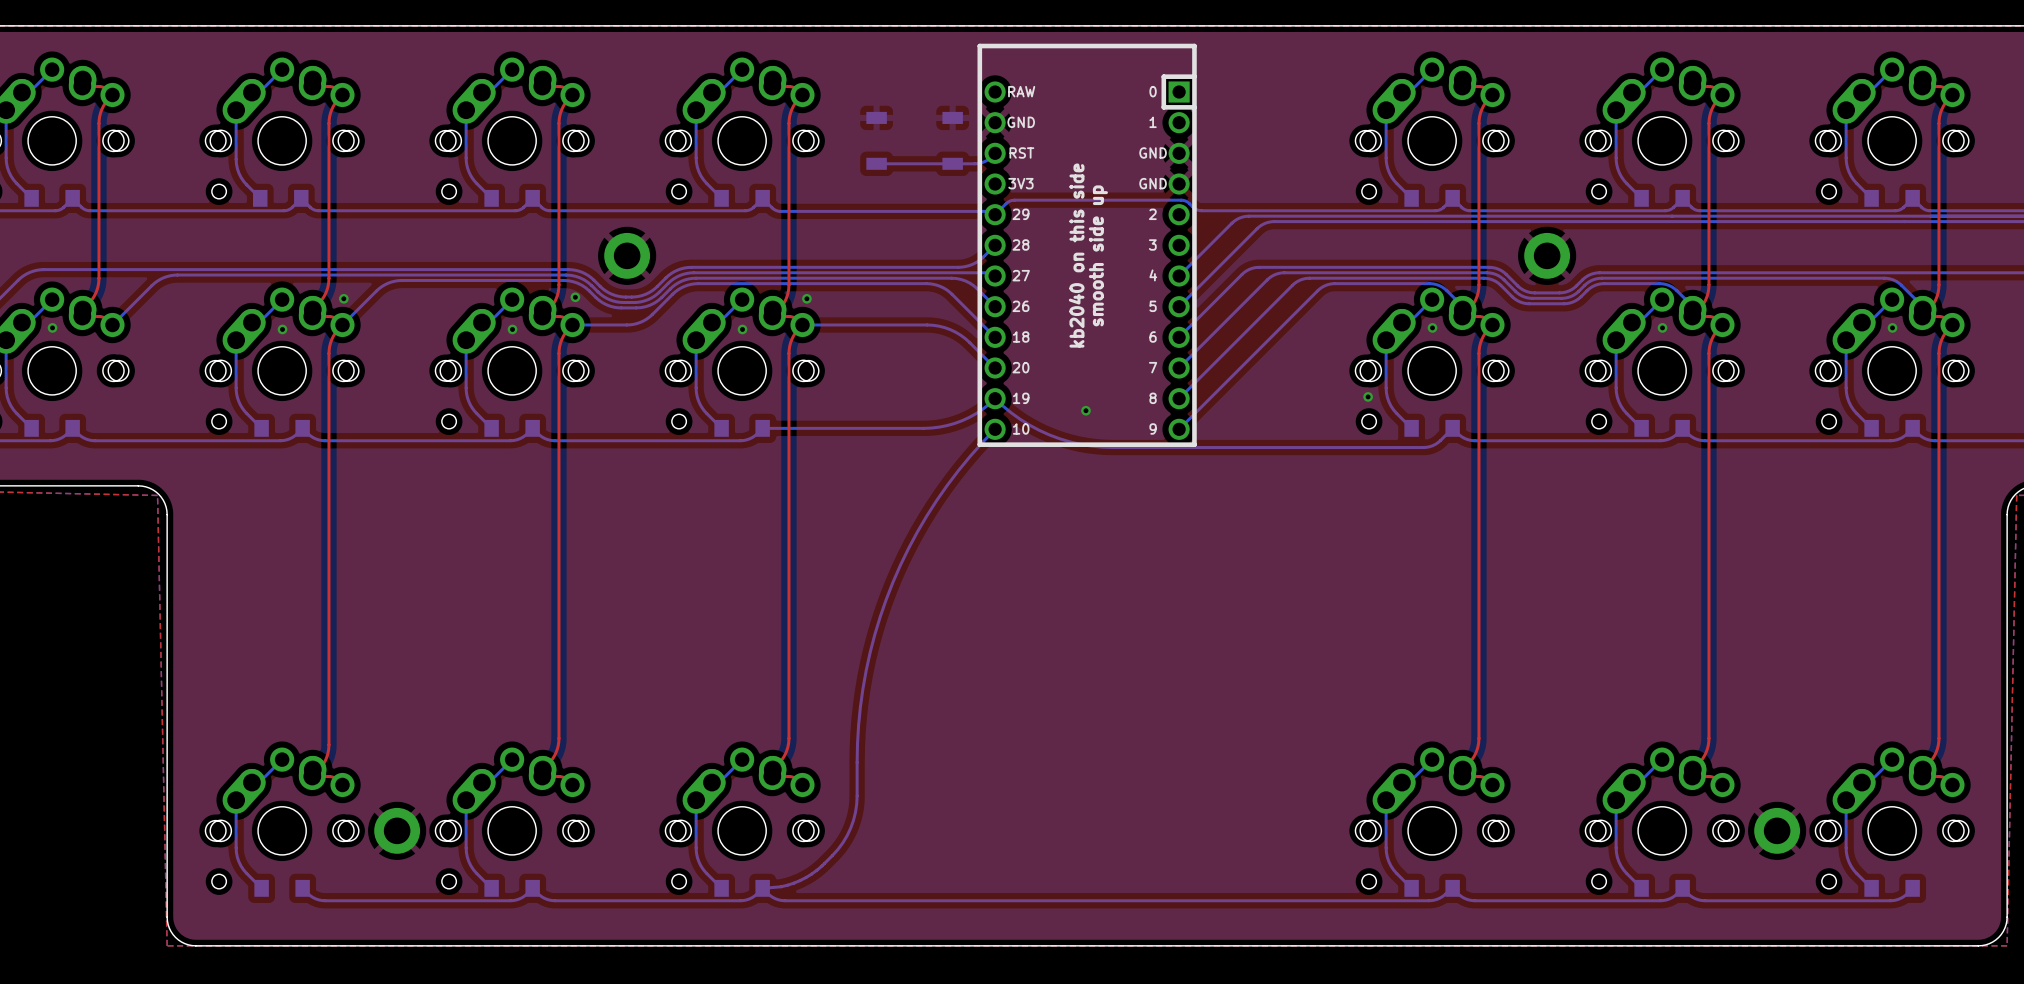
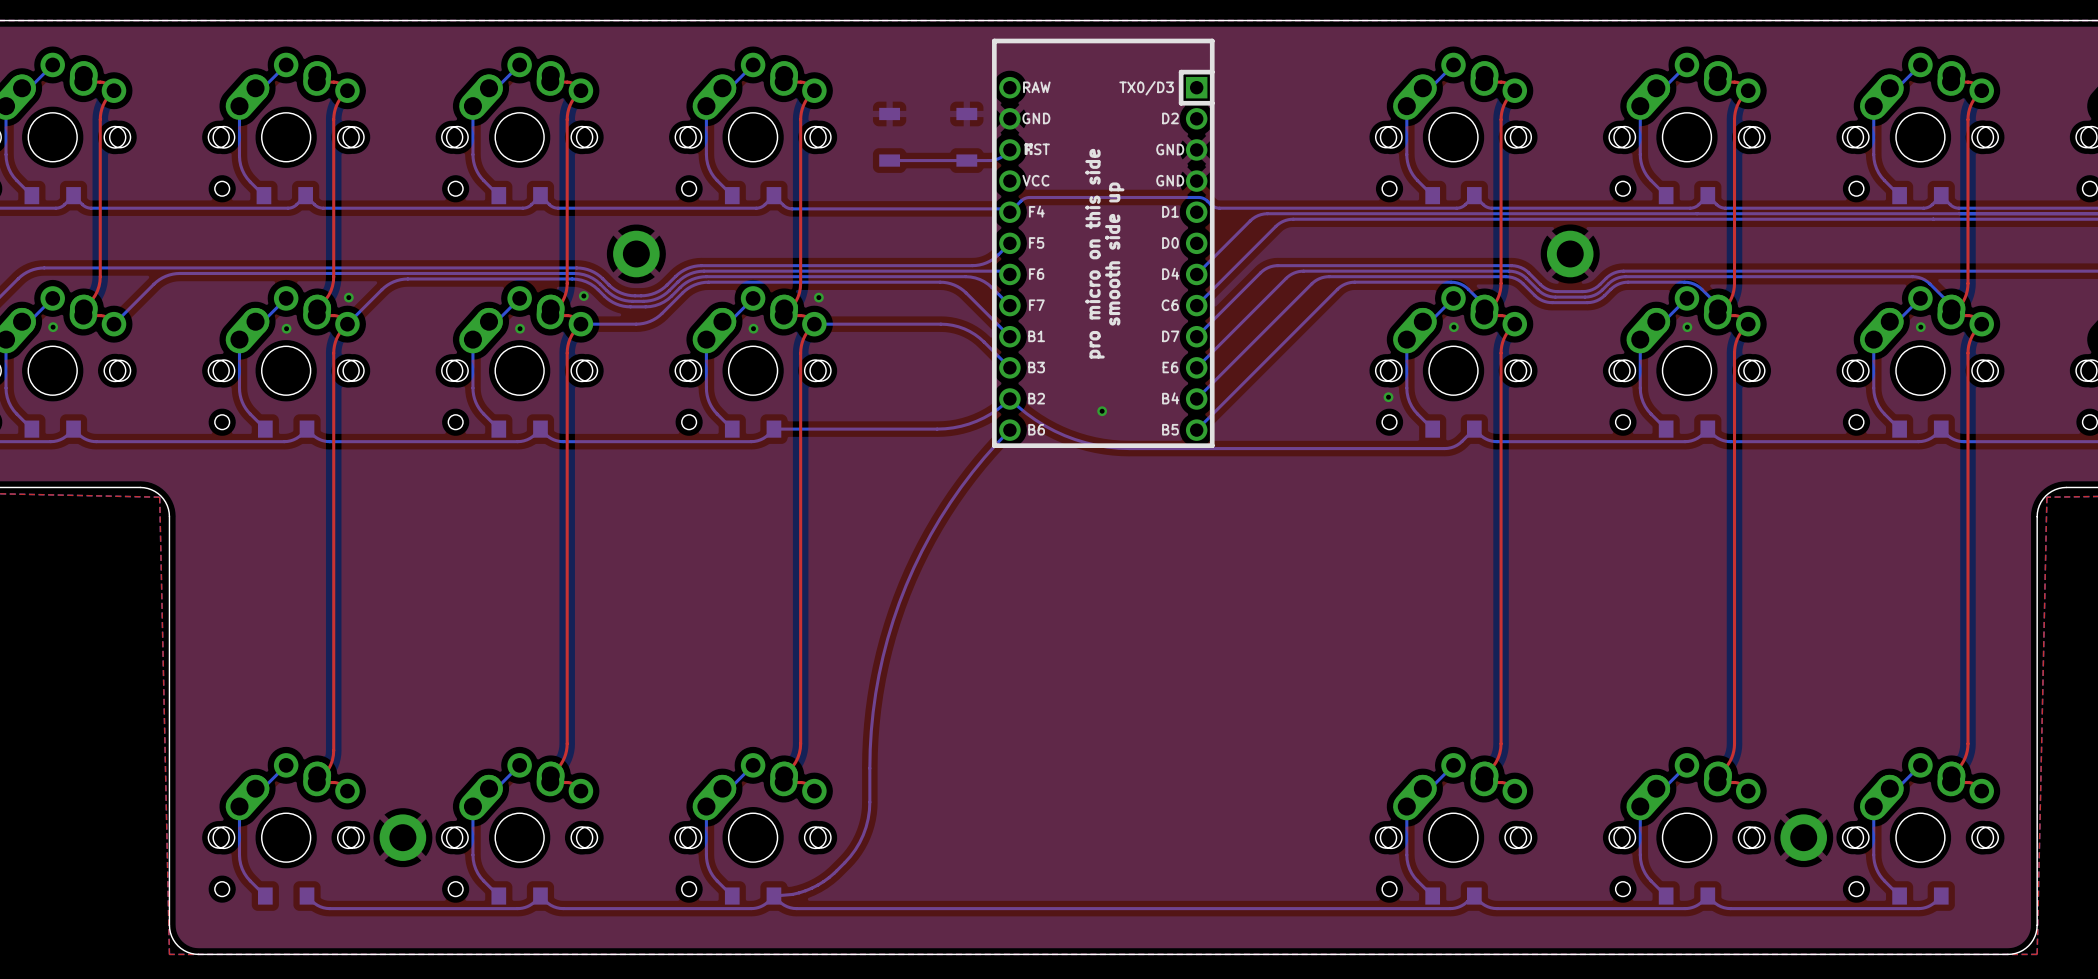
part footprint: [977, 43, 1197, 447] -> [992, 38, 1215, 449]
text: kb2040 on this side (1076, 255) -> pro micro on this side (1095, 253)

